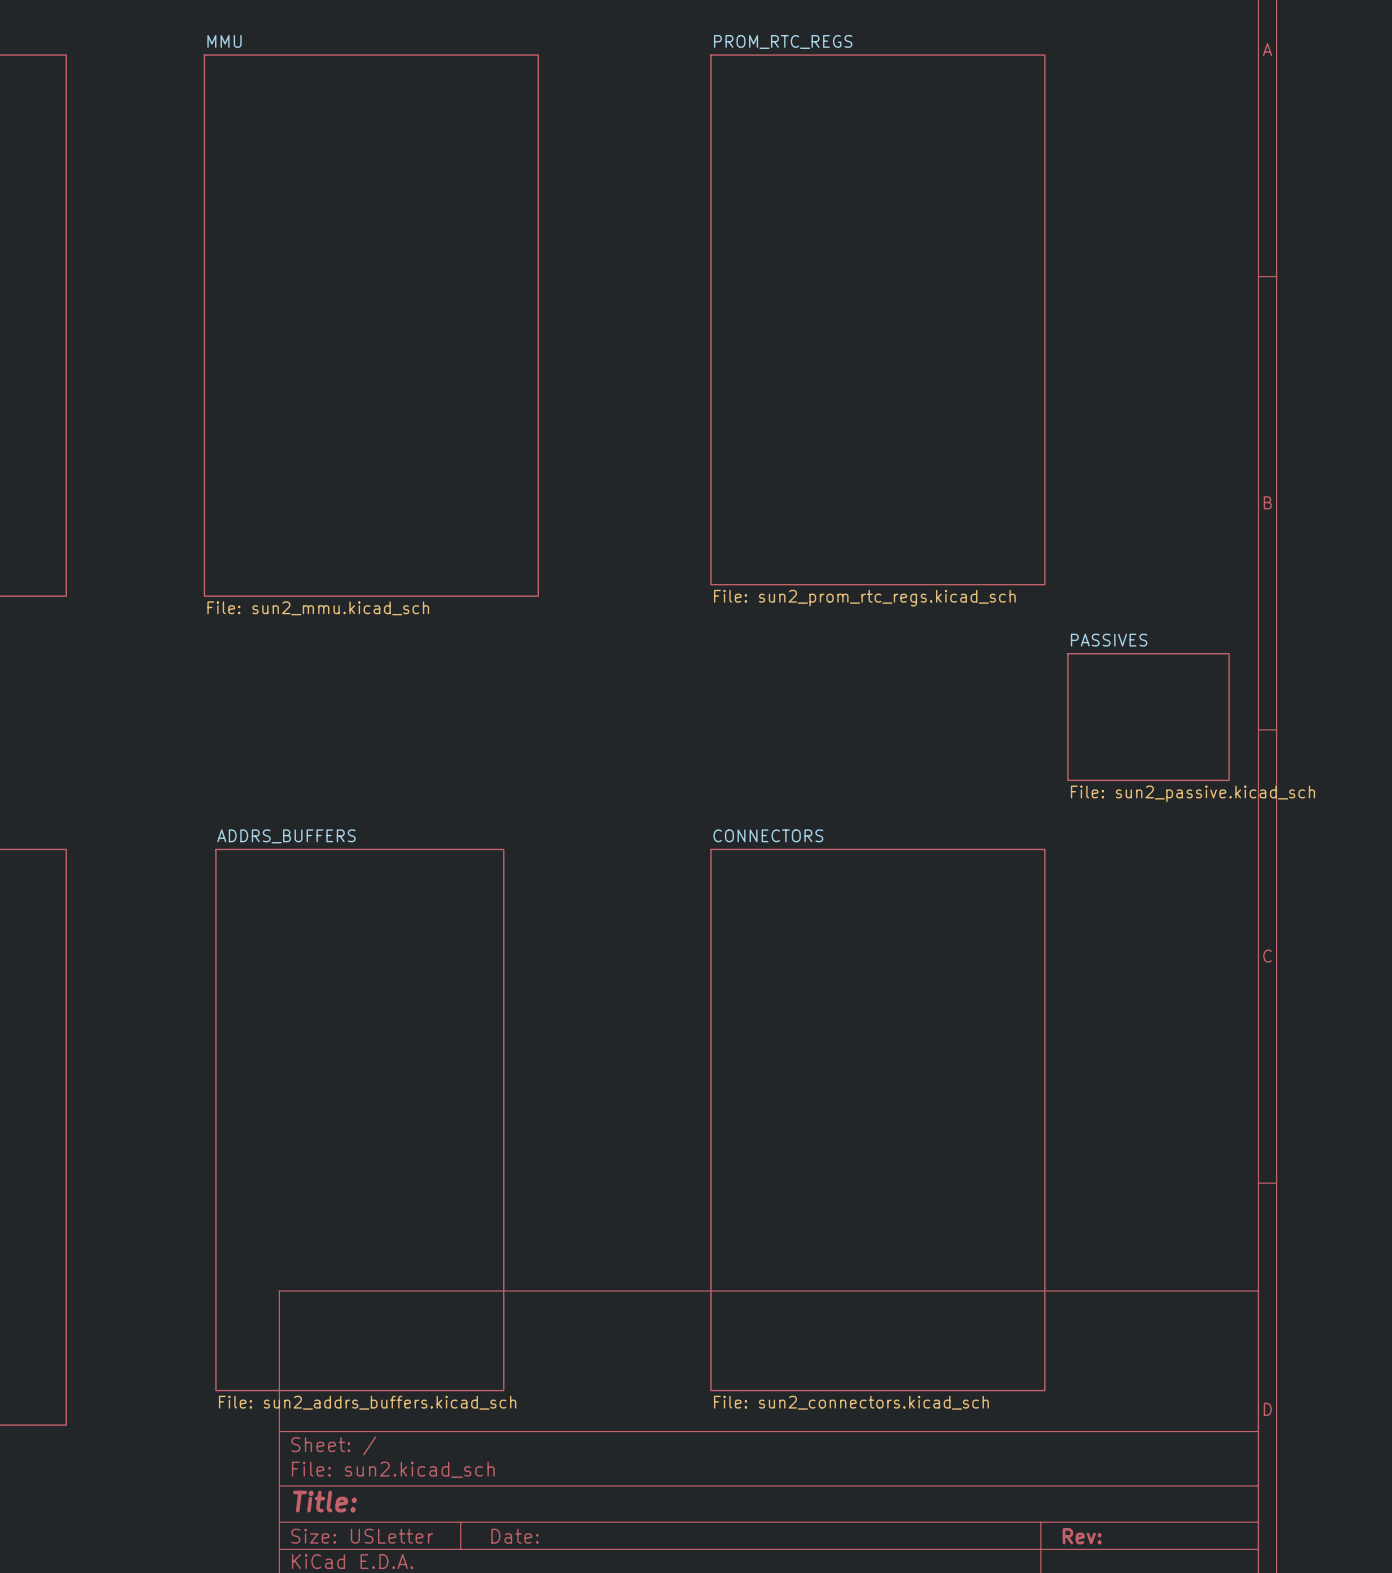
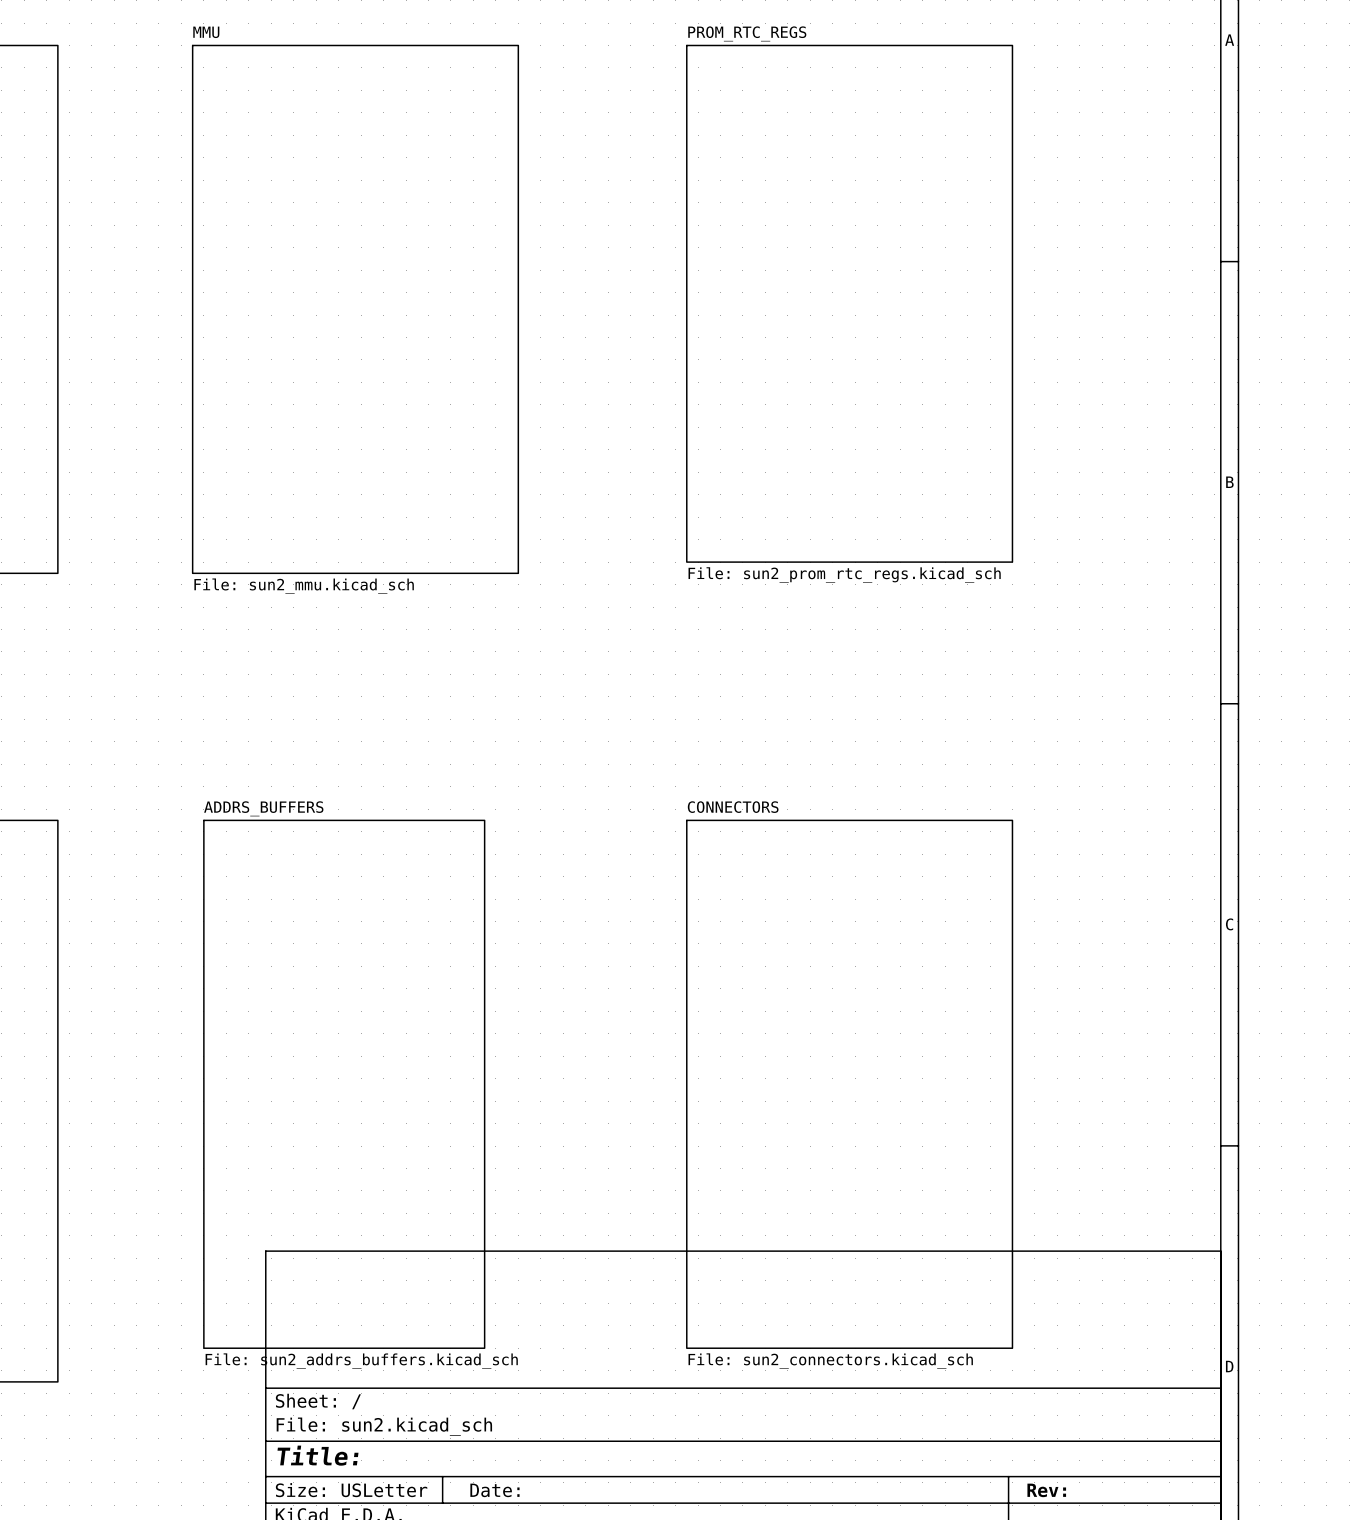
sheet PASSIVES: File: sun2_passive.kicad_sch (1148, 717) -> none

